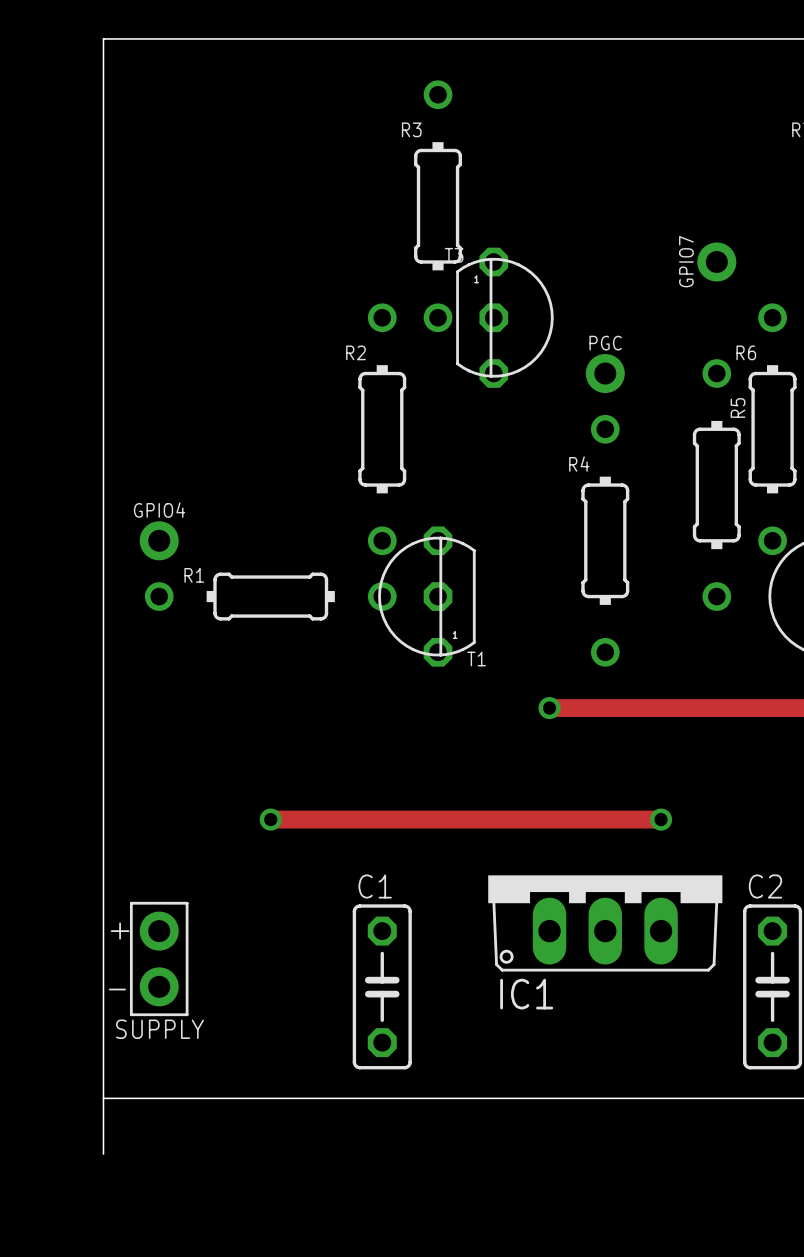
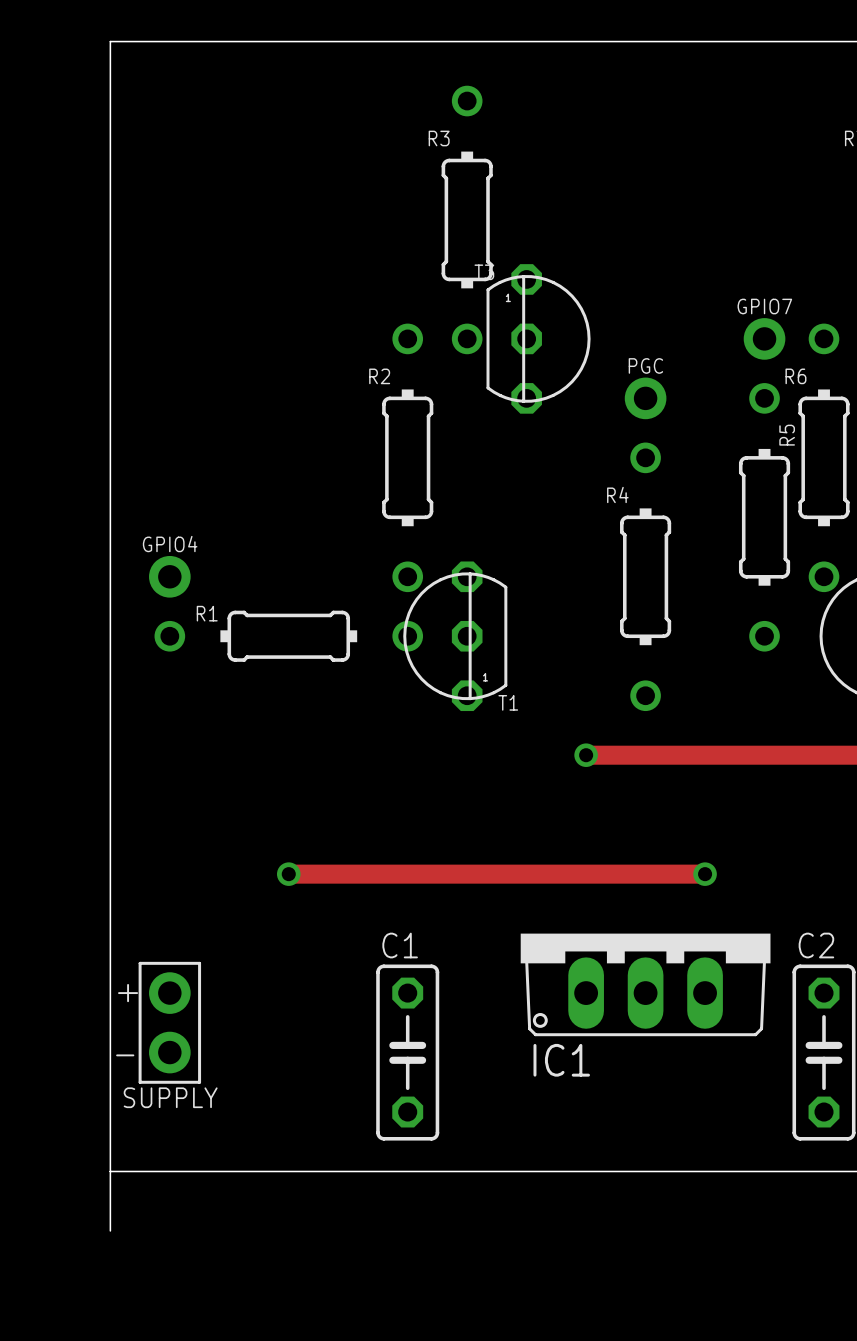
GPIO7 name rotation: 0° (686, 261) -> 90° clockwise (764, 306)
GPIO7 position: (716, 262) -> (764, 338)

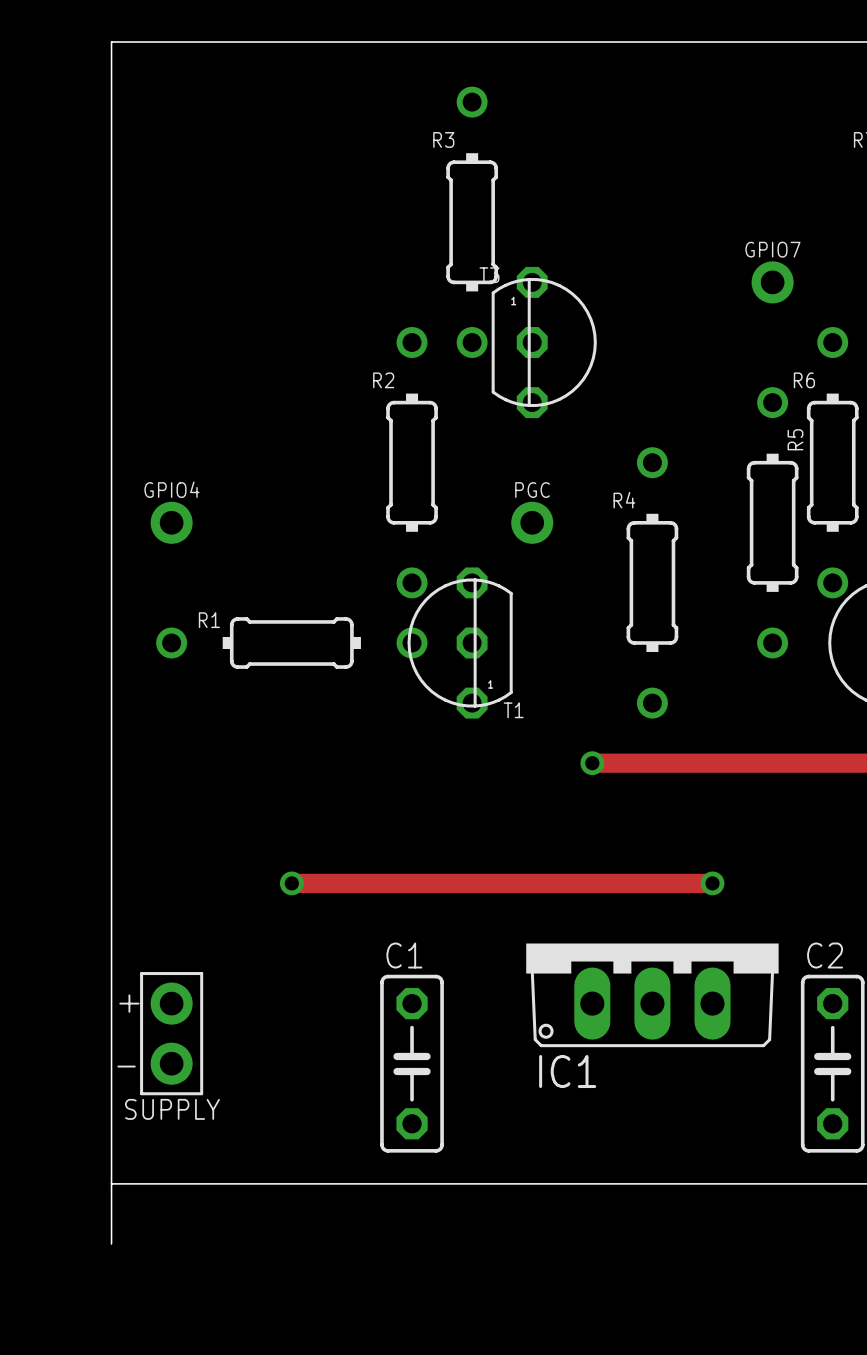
GPIO7 position: (764, 338) -> (772, 282)
PGC position: (645, 398) -> (532, 522)
GPIO4 position: (169, 576) -> (171, 522)

